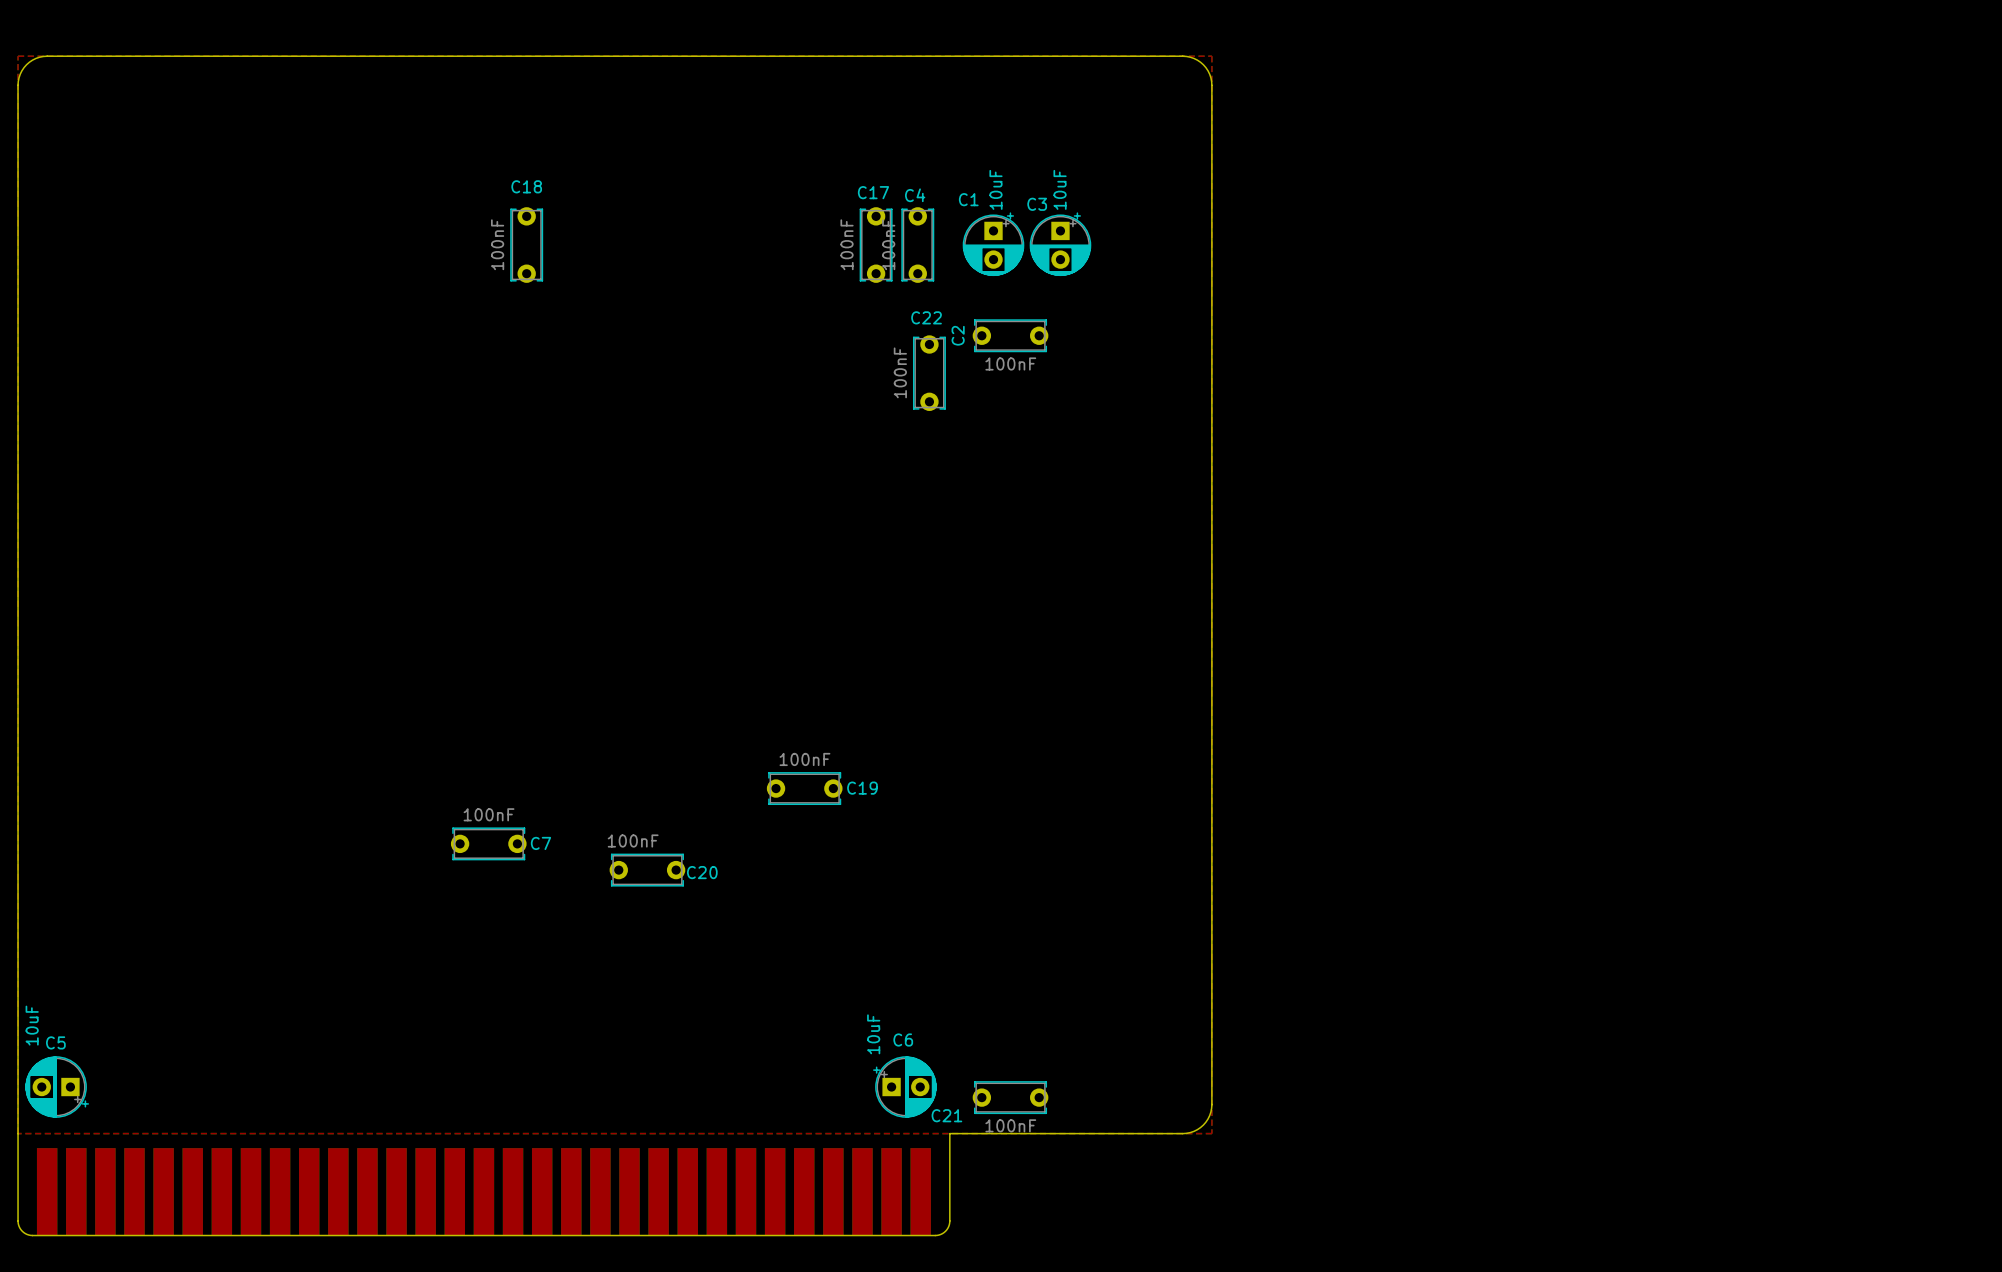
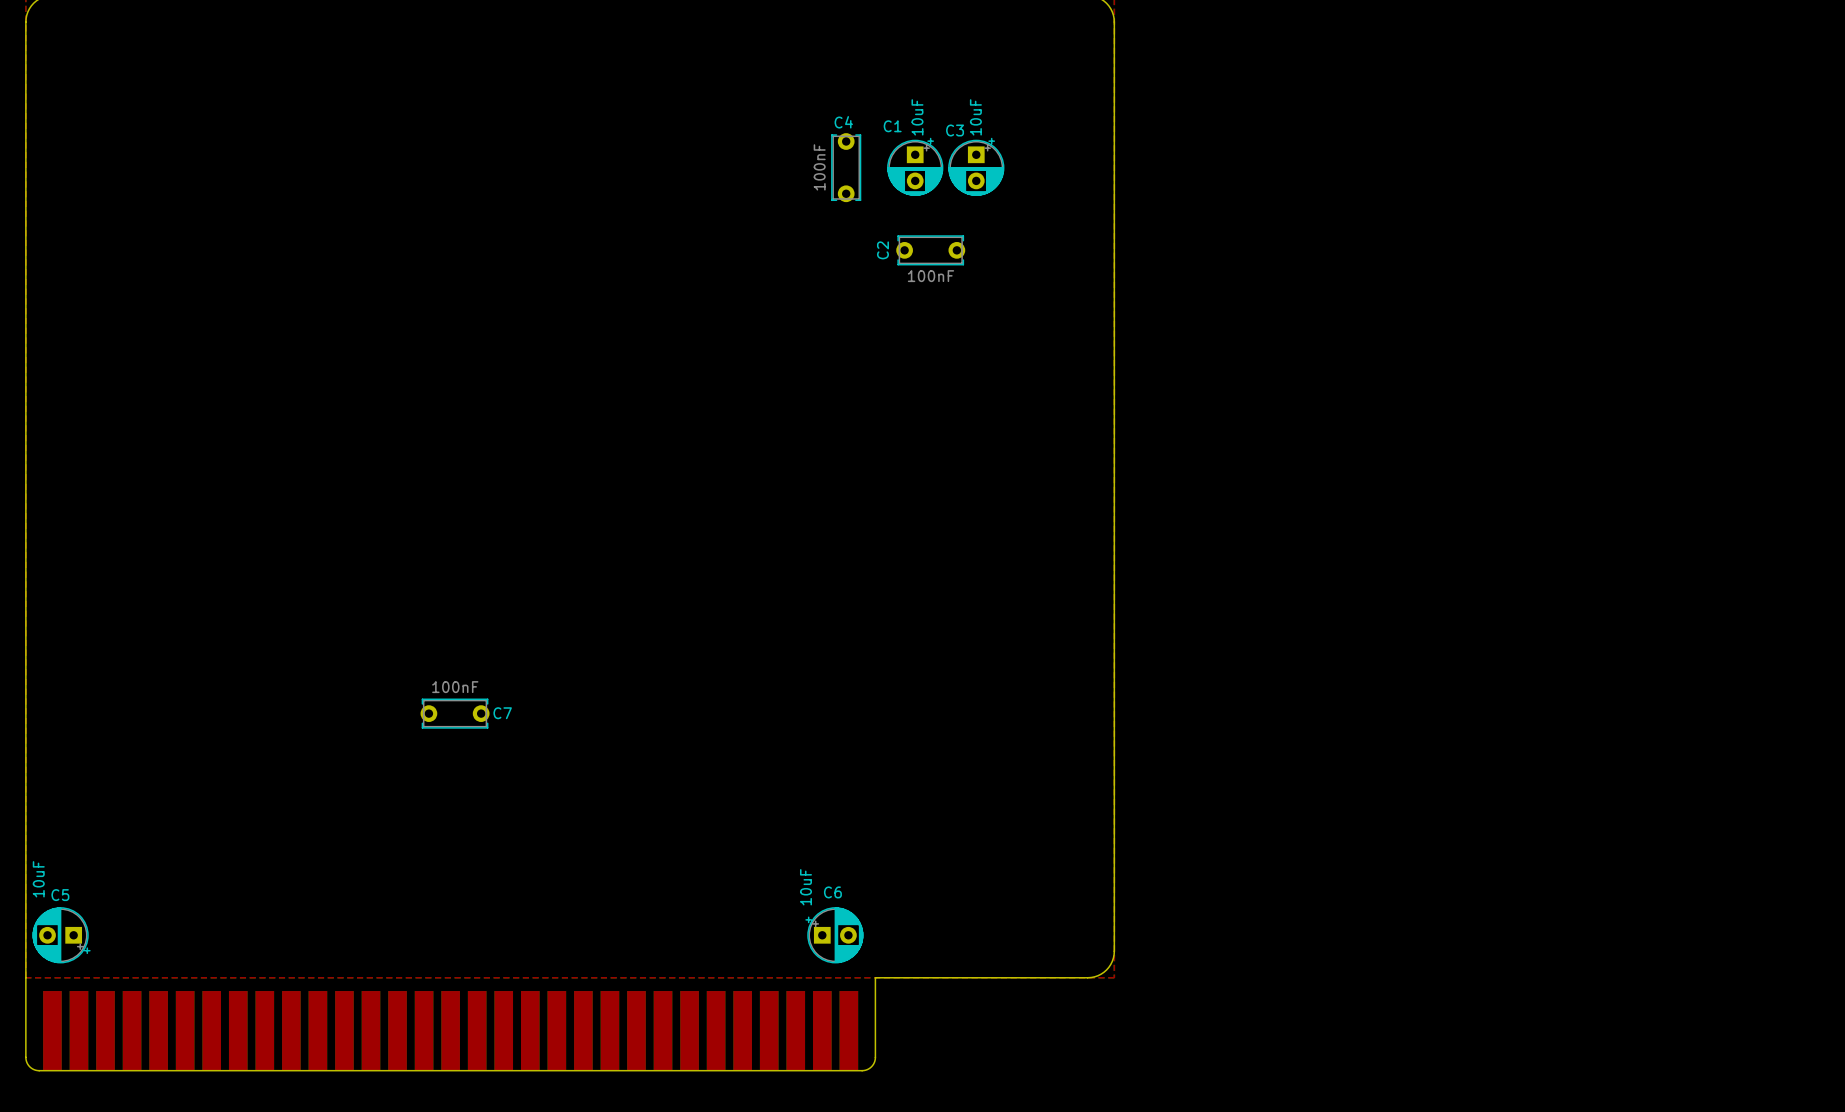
C18: 100nF (526, 245) -> none
C17: 100nF (876, 245) -> none
C22: 100nF (929, 373) -> none
C19: 100nF (804, 788) -> none
C20: 100nF (647, 870) -> none
C21: 100nF (1010, 1097) -> none

